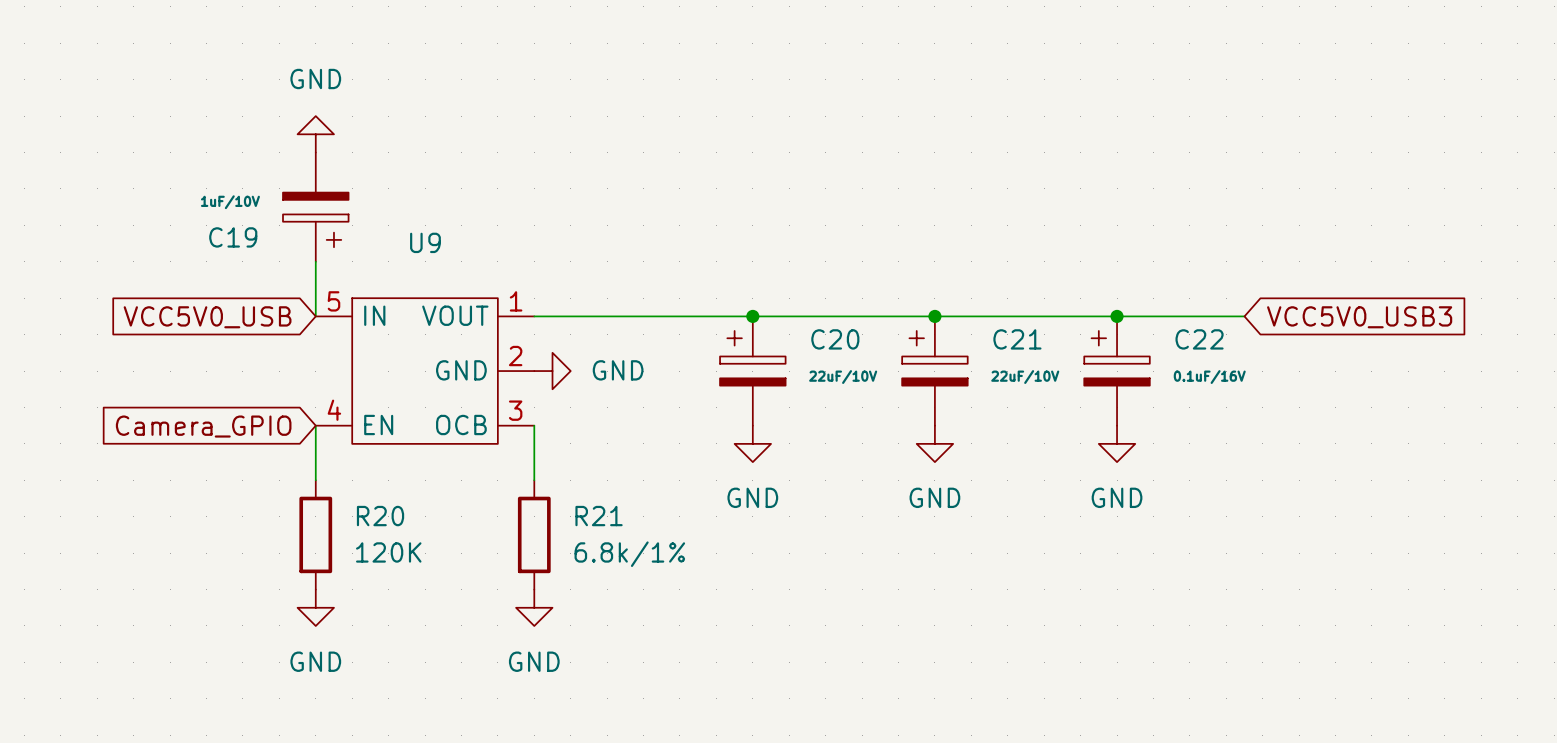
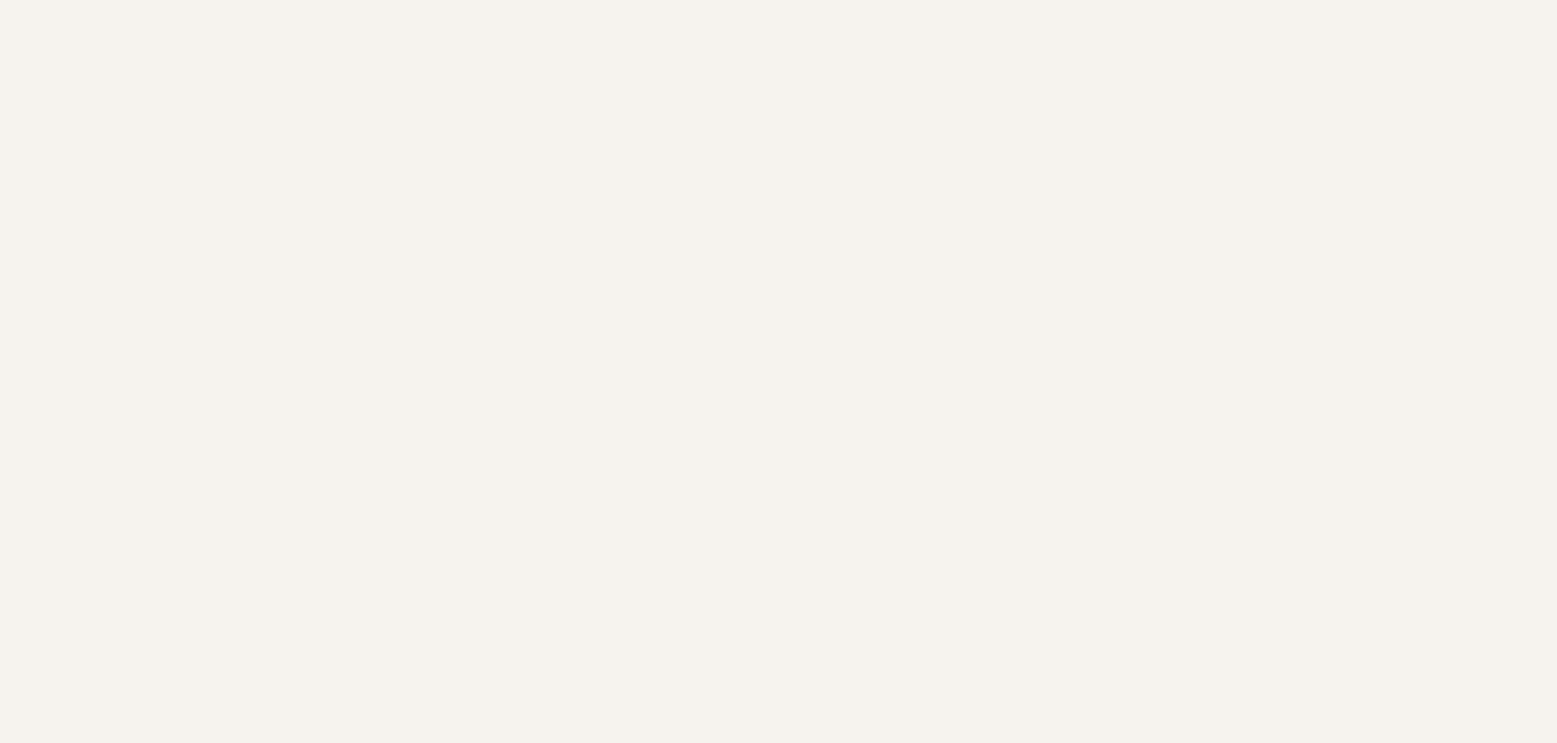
power symbol: GND (315, 134) -> none
C19: 1uF/10V (315, 207) -> none
wire: (315, 261) (315, 316) -> none
wire: (534, 316) (1244, 316) -> none
junction: (752, 316) -> none
junction: (934, 316) -> none
junction: (1117, 316) -> none
global label: VCC5V0_USB (207, 317) -> none
global label: VCC5V0_USB3 (1359, 317) -> none
U9: (425, 371) -> none
power symbol: GND (552, 371) -> none
C20: 22uF/10V (752, 371) -> none
C21: 22uF/10V (934, 371) -> none
C22: 0.1uF/16V (1117, 371) -> none
wire: (315, 425) (315, 480) -> none
wire: (534, 425) (534, 480) -> none
global label: Camera_GPIO (203, 426) -> none
power symbol: GND (752, 443) -> none
power symbol: GND (934, 443) -> none
power symbol: GND (1117, 443) -> none
R20: 120K (315, 534) -> none
R21: 6.8k/1% (534, 534) -> none
power symbol: GND (315, 607) -> none
power symbol: GND (534, 607) -> none

